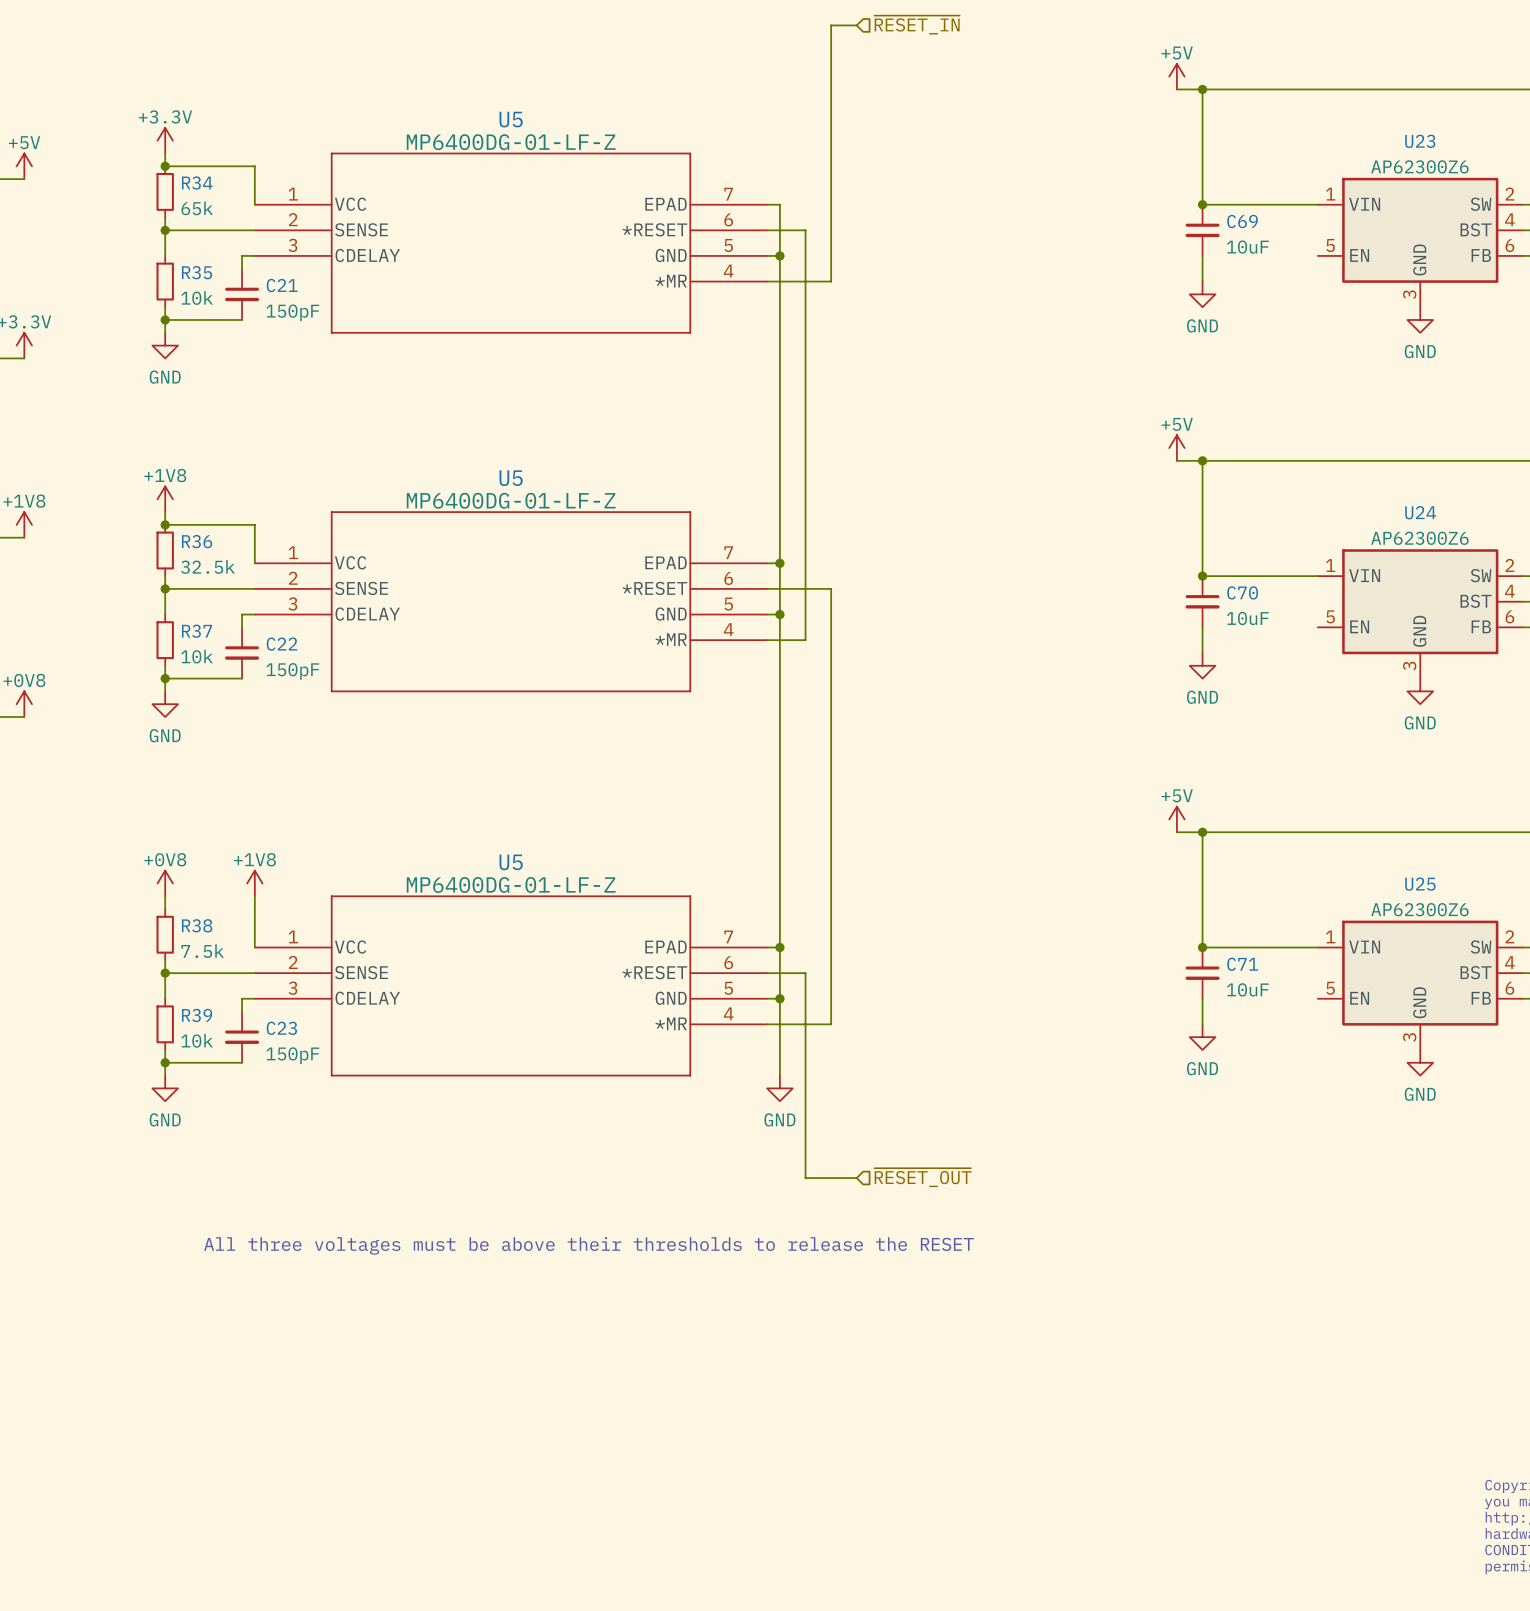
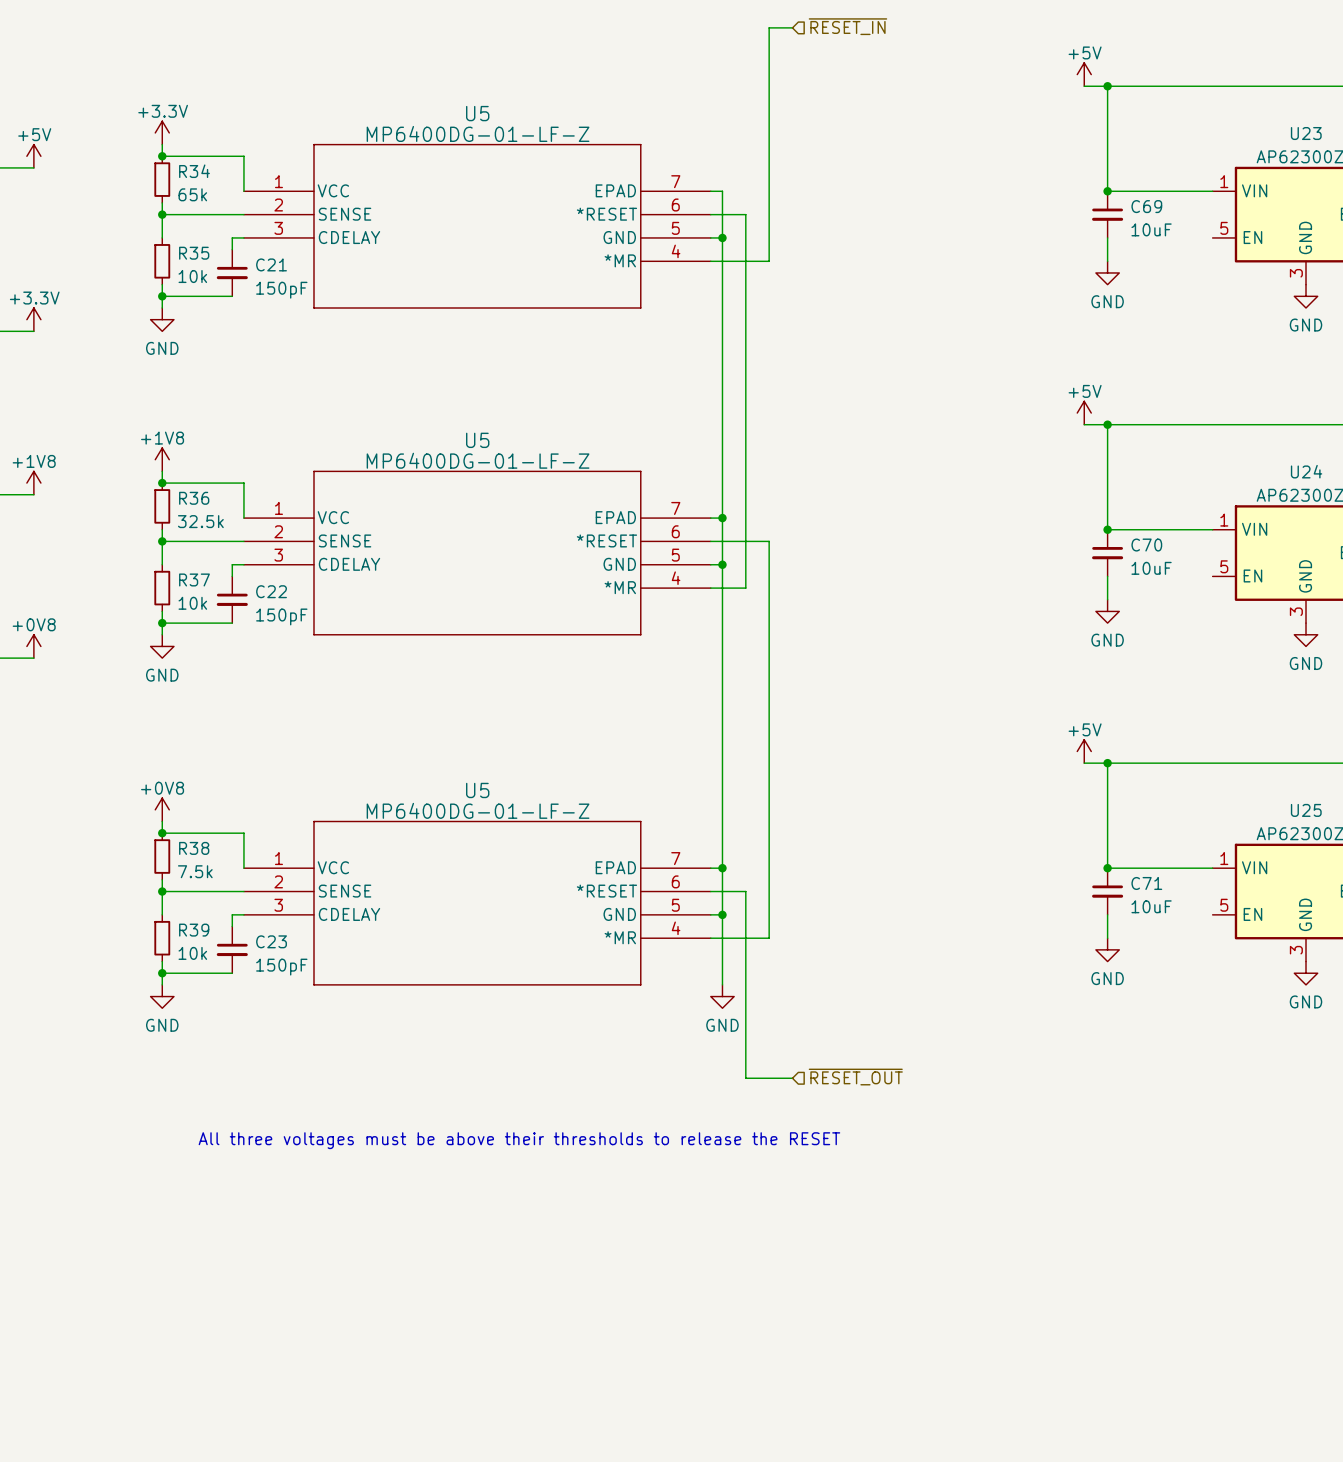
power symbol: +1V8 (254, 883) -> none
wire: (254, 896) (254, 909) -> (162, 833) (243, 833)
junction: none -> (162, 833)

